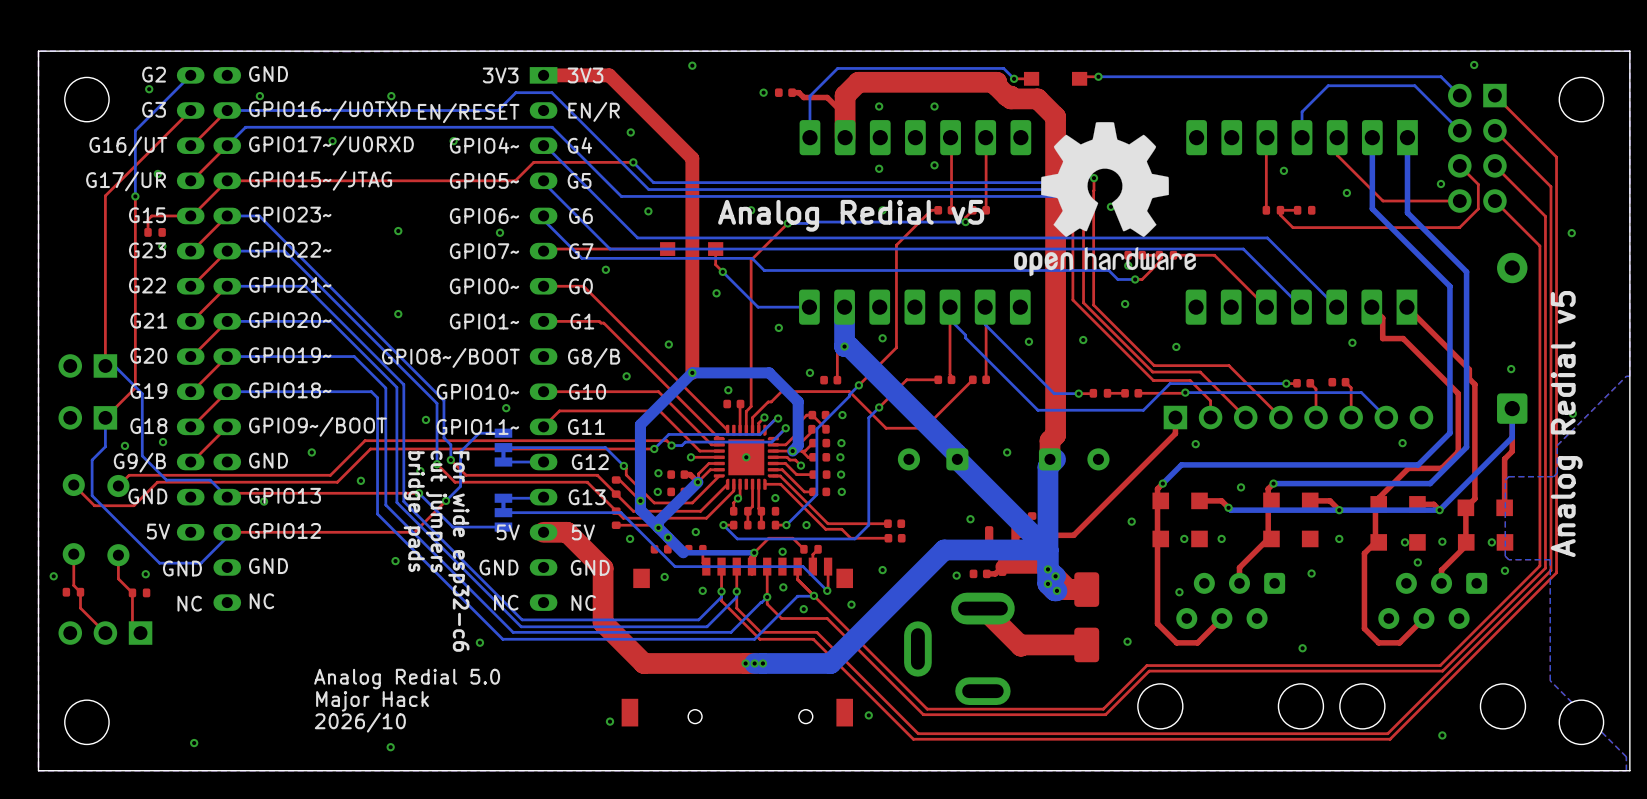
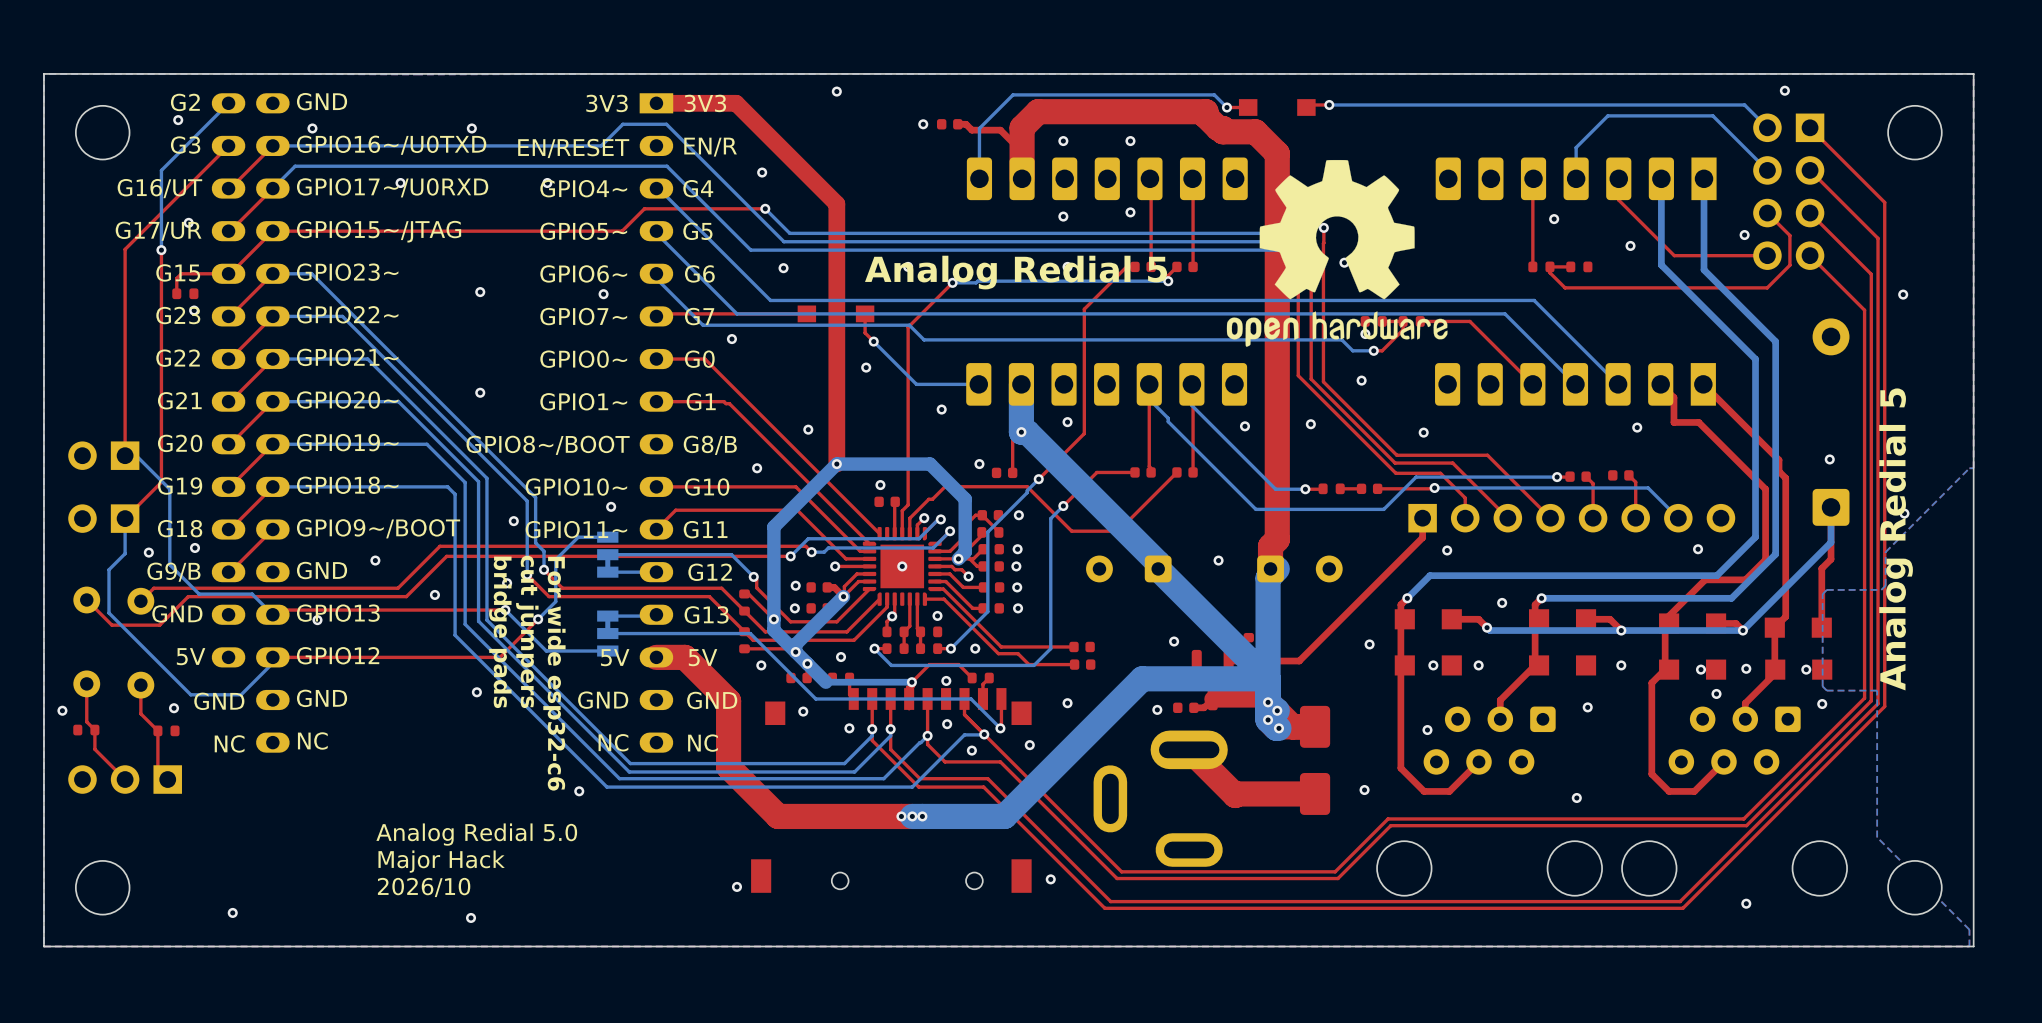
text: Analog Redial v5 (851, 215) -> Analog Redial 5 (1016, 272)
text: Analog Redial v5 (1566, 424) -> Analog Redial 5 (1896, 539)

